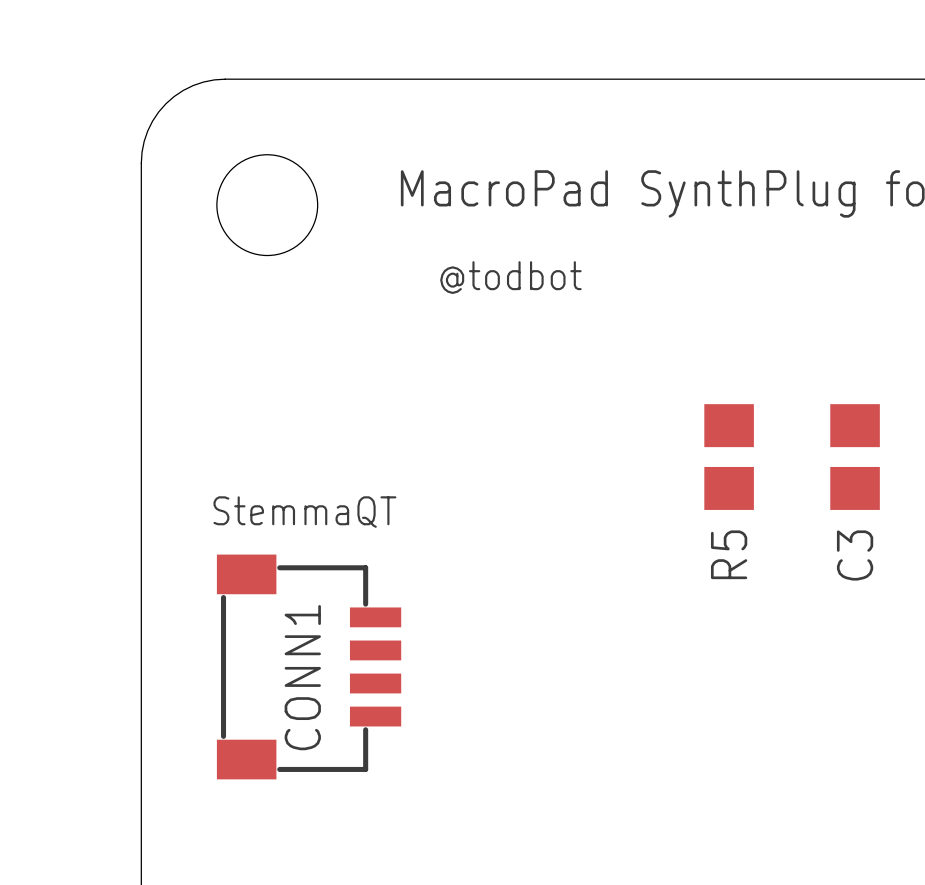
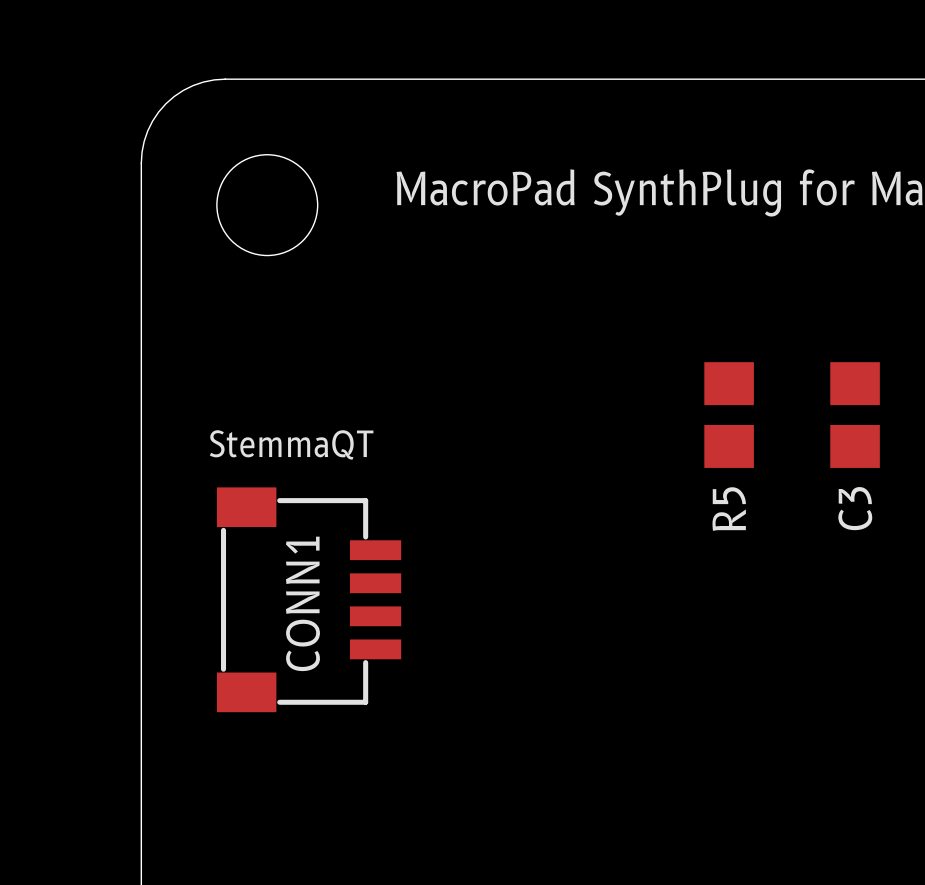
text: @todbot (510, 277) -> none
R5 position: (729, 457) -> (729, 415)
C3 position: (855, 457) -> (855, 415)
text position: StemmaQT (304, 512) -> StemmaQT (291, 444)
CONN1 position: (309, 666) -> (309, 599)

